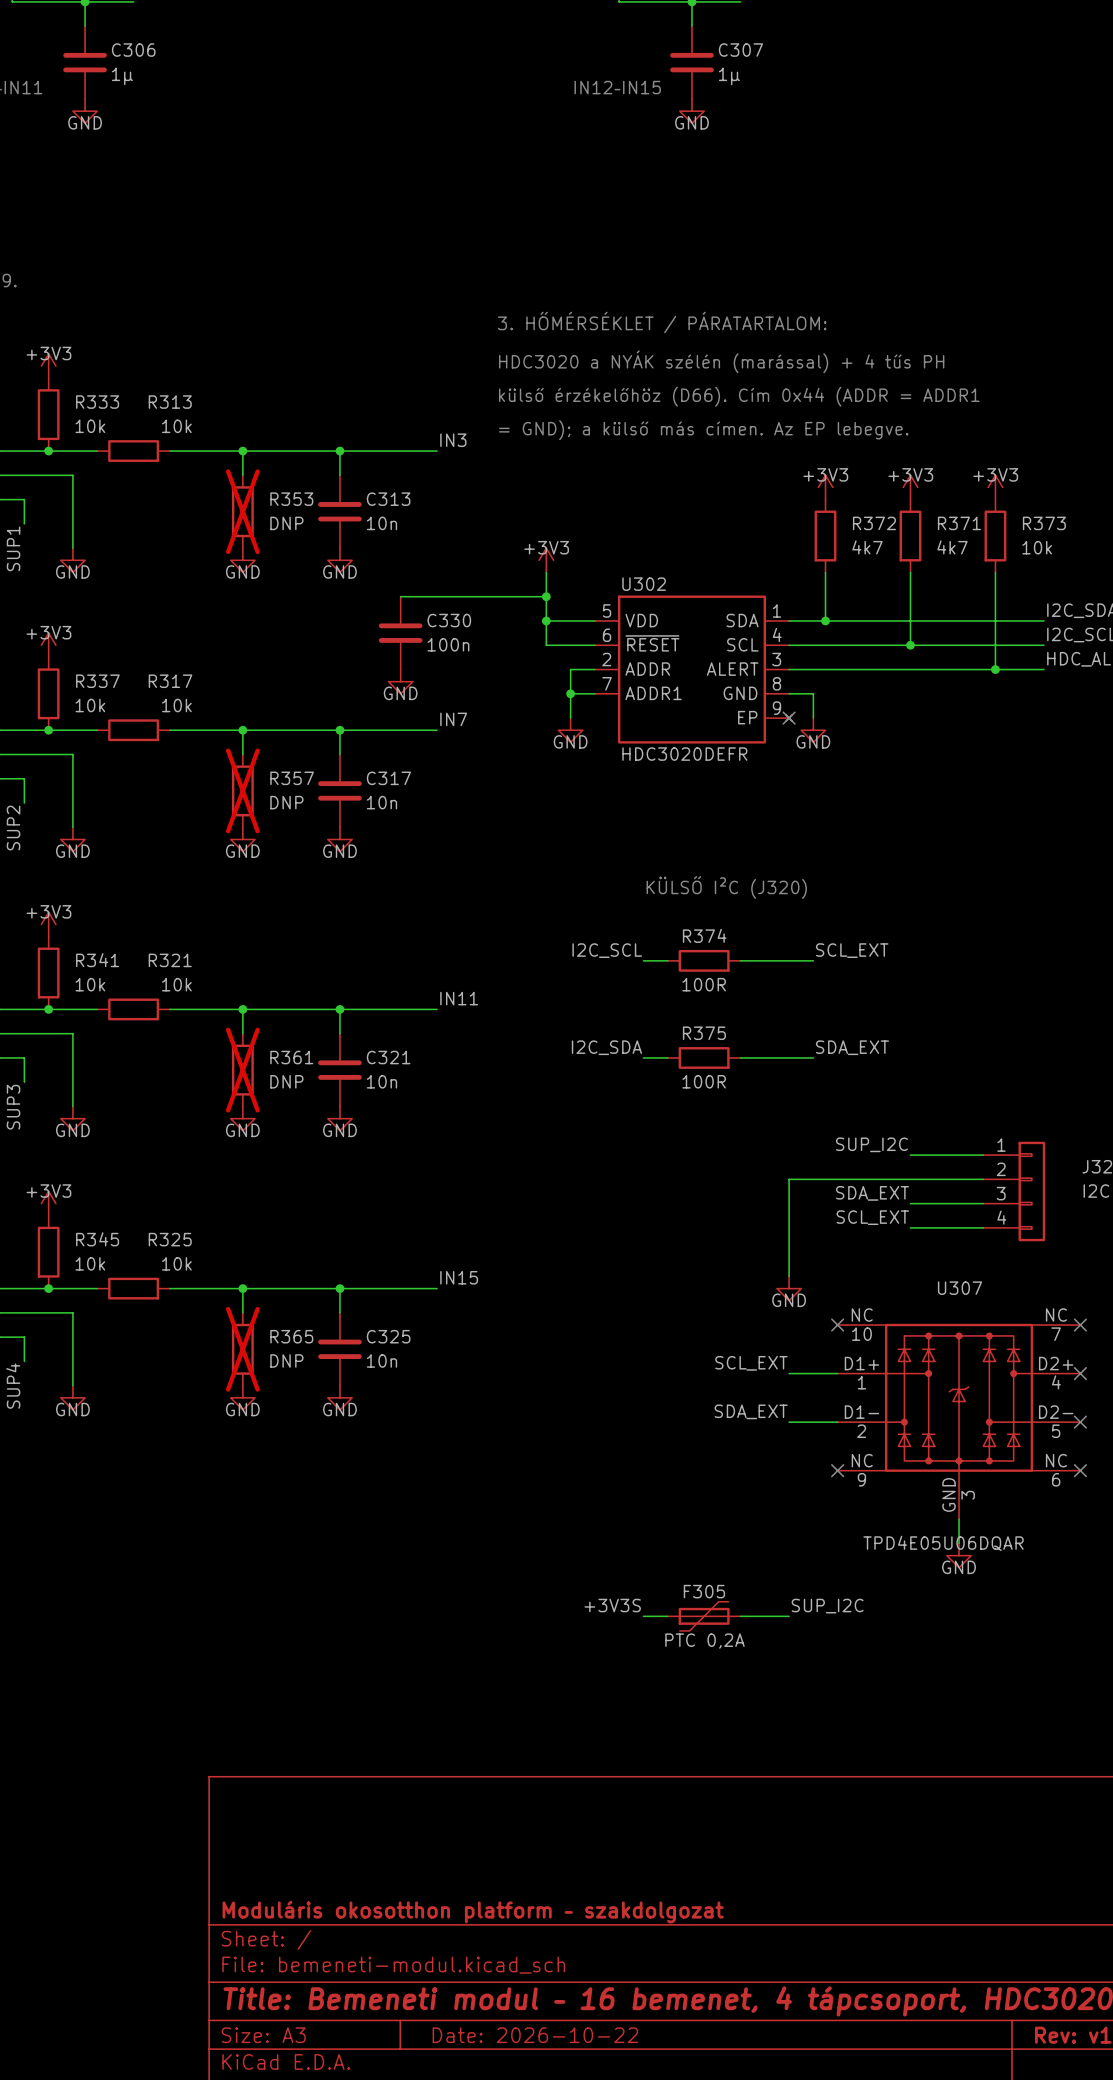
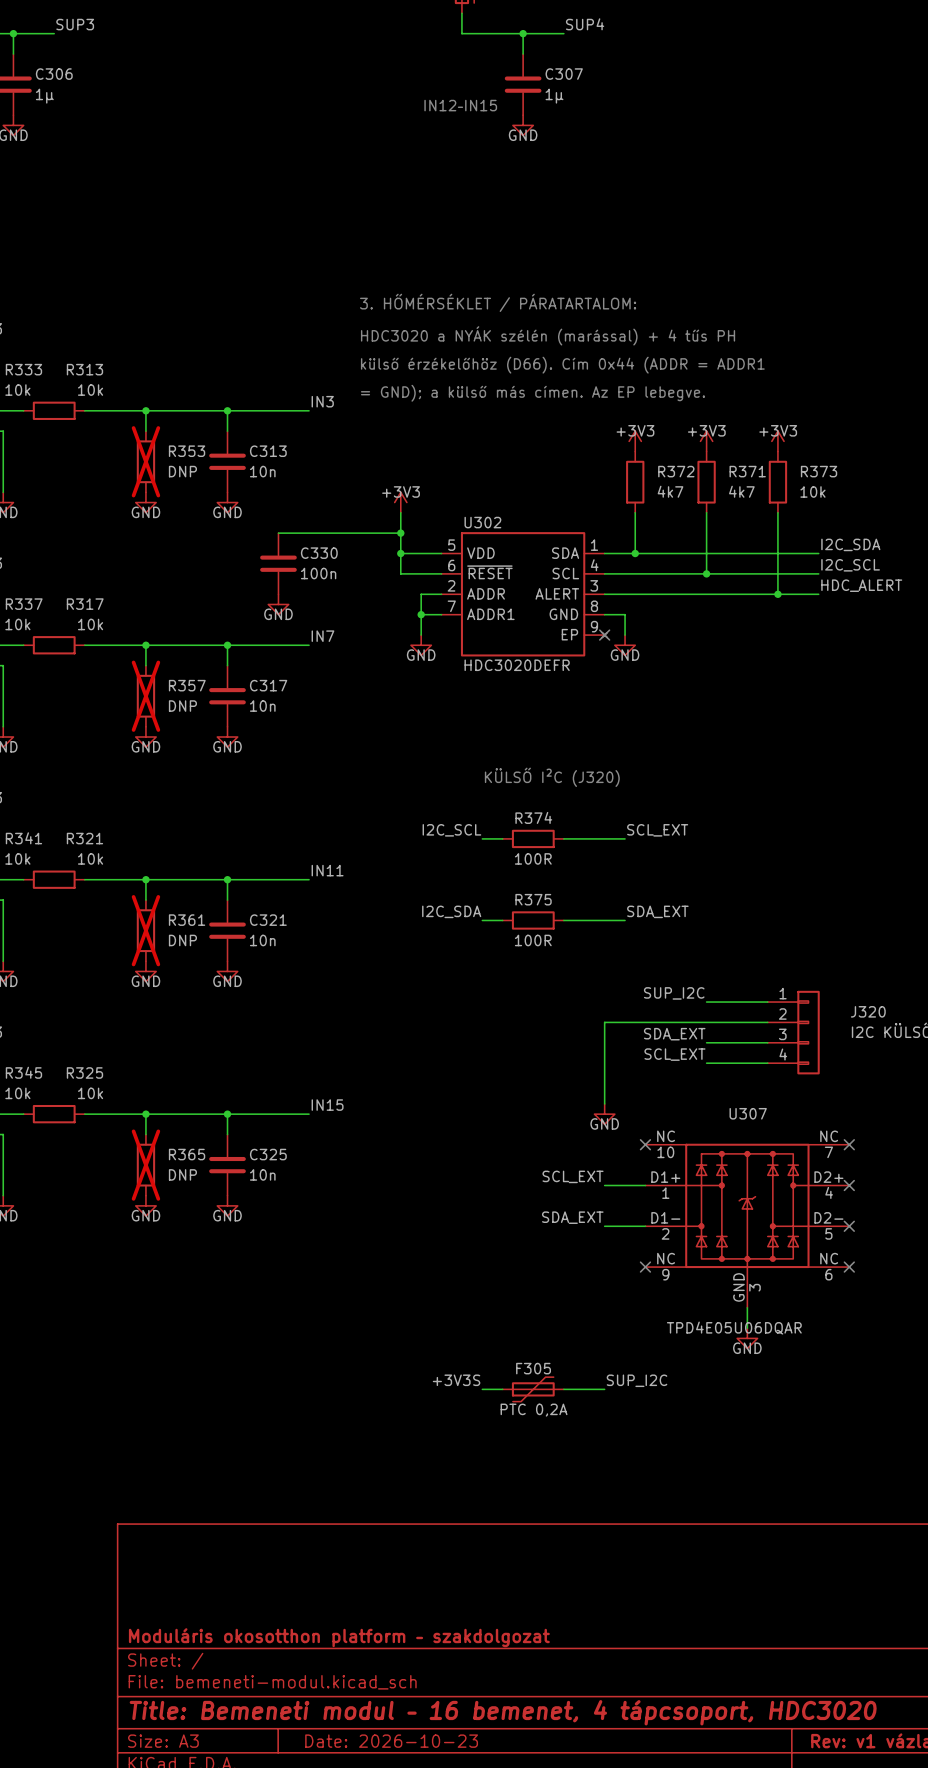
title block: Date: 2026-10-22 (535, 2035) -> Date: 2026-10-23 (391, 1741)

